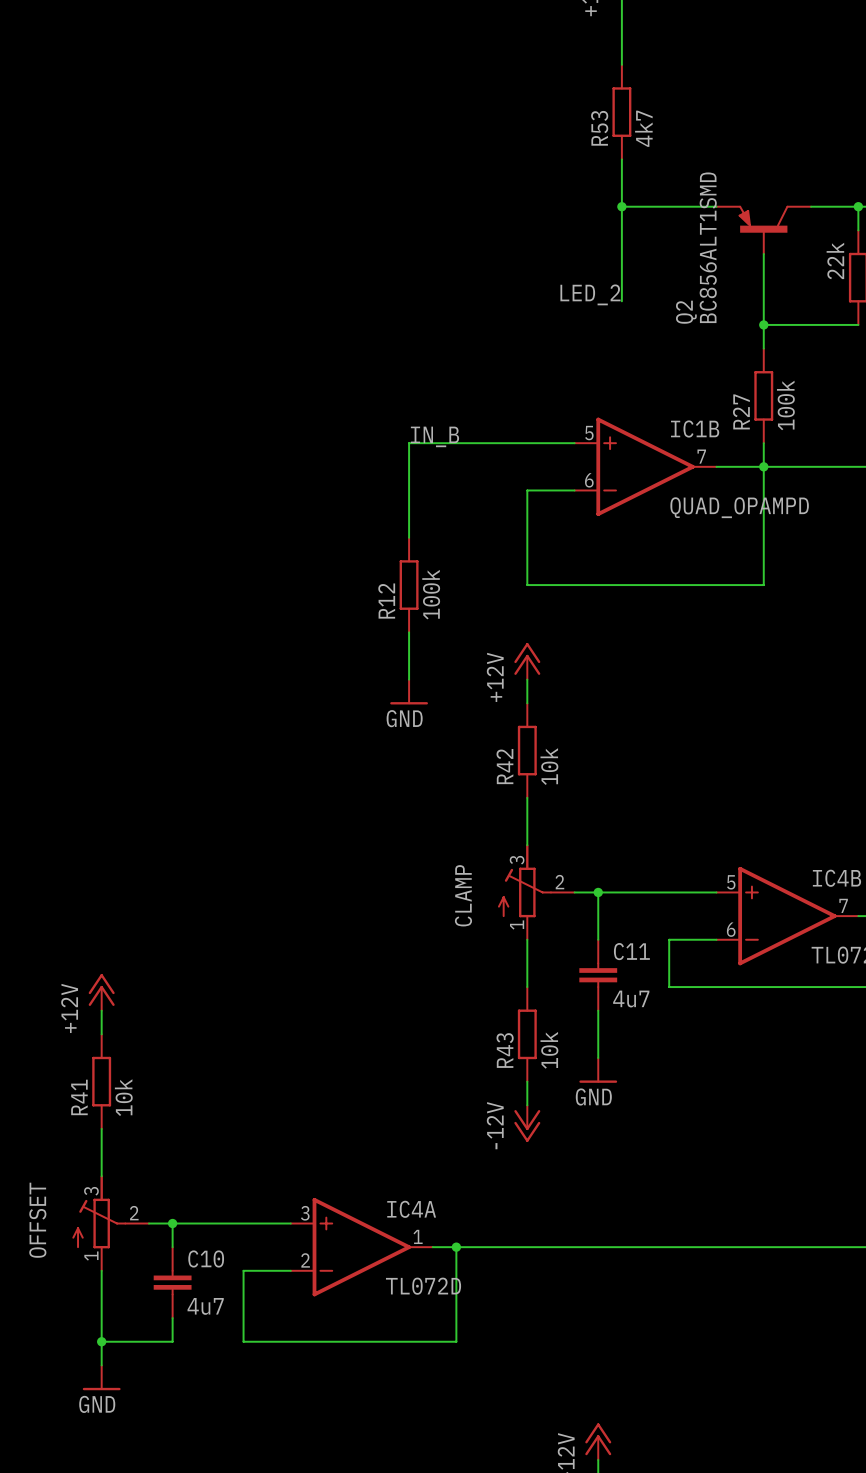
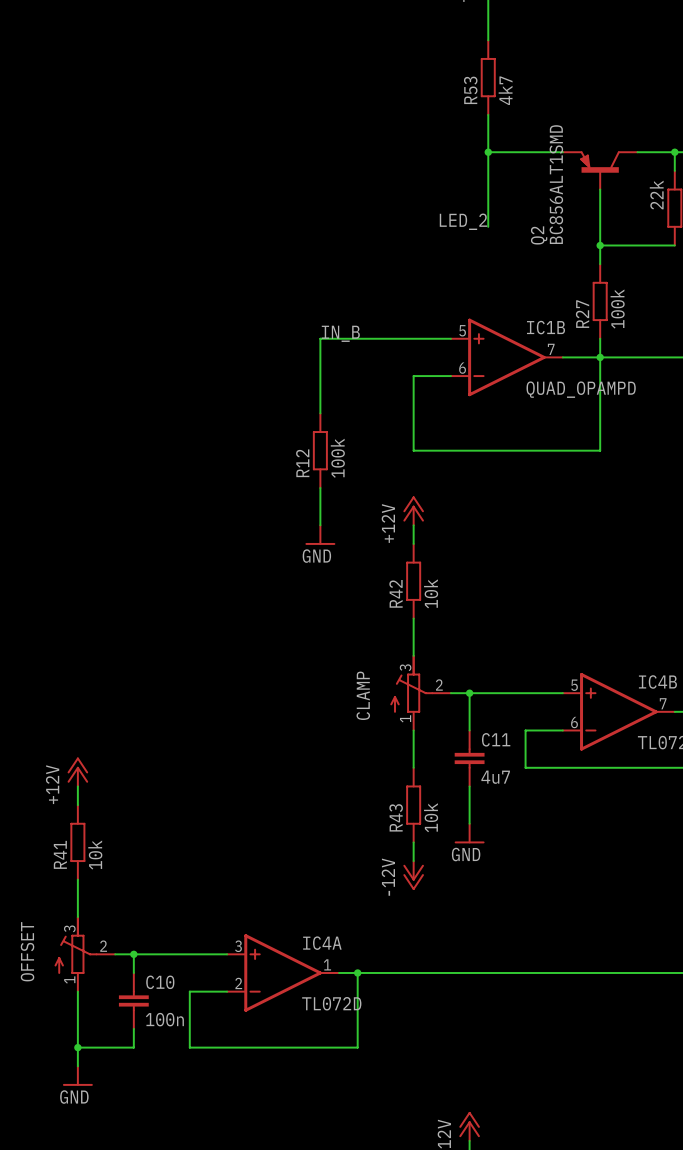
C10 value: 4u7 (205, 1306) -> 100n (164, 1019)

